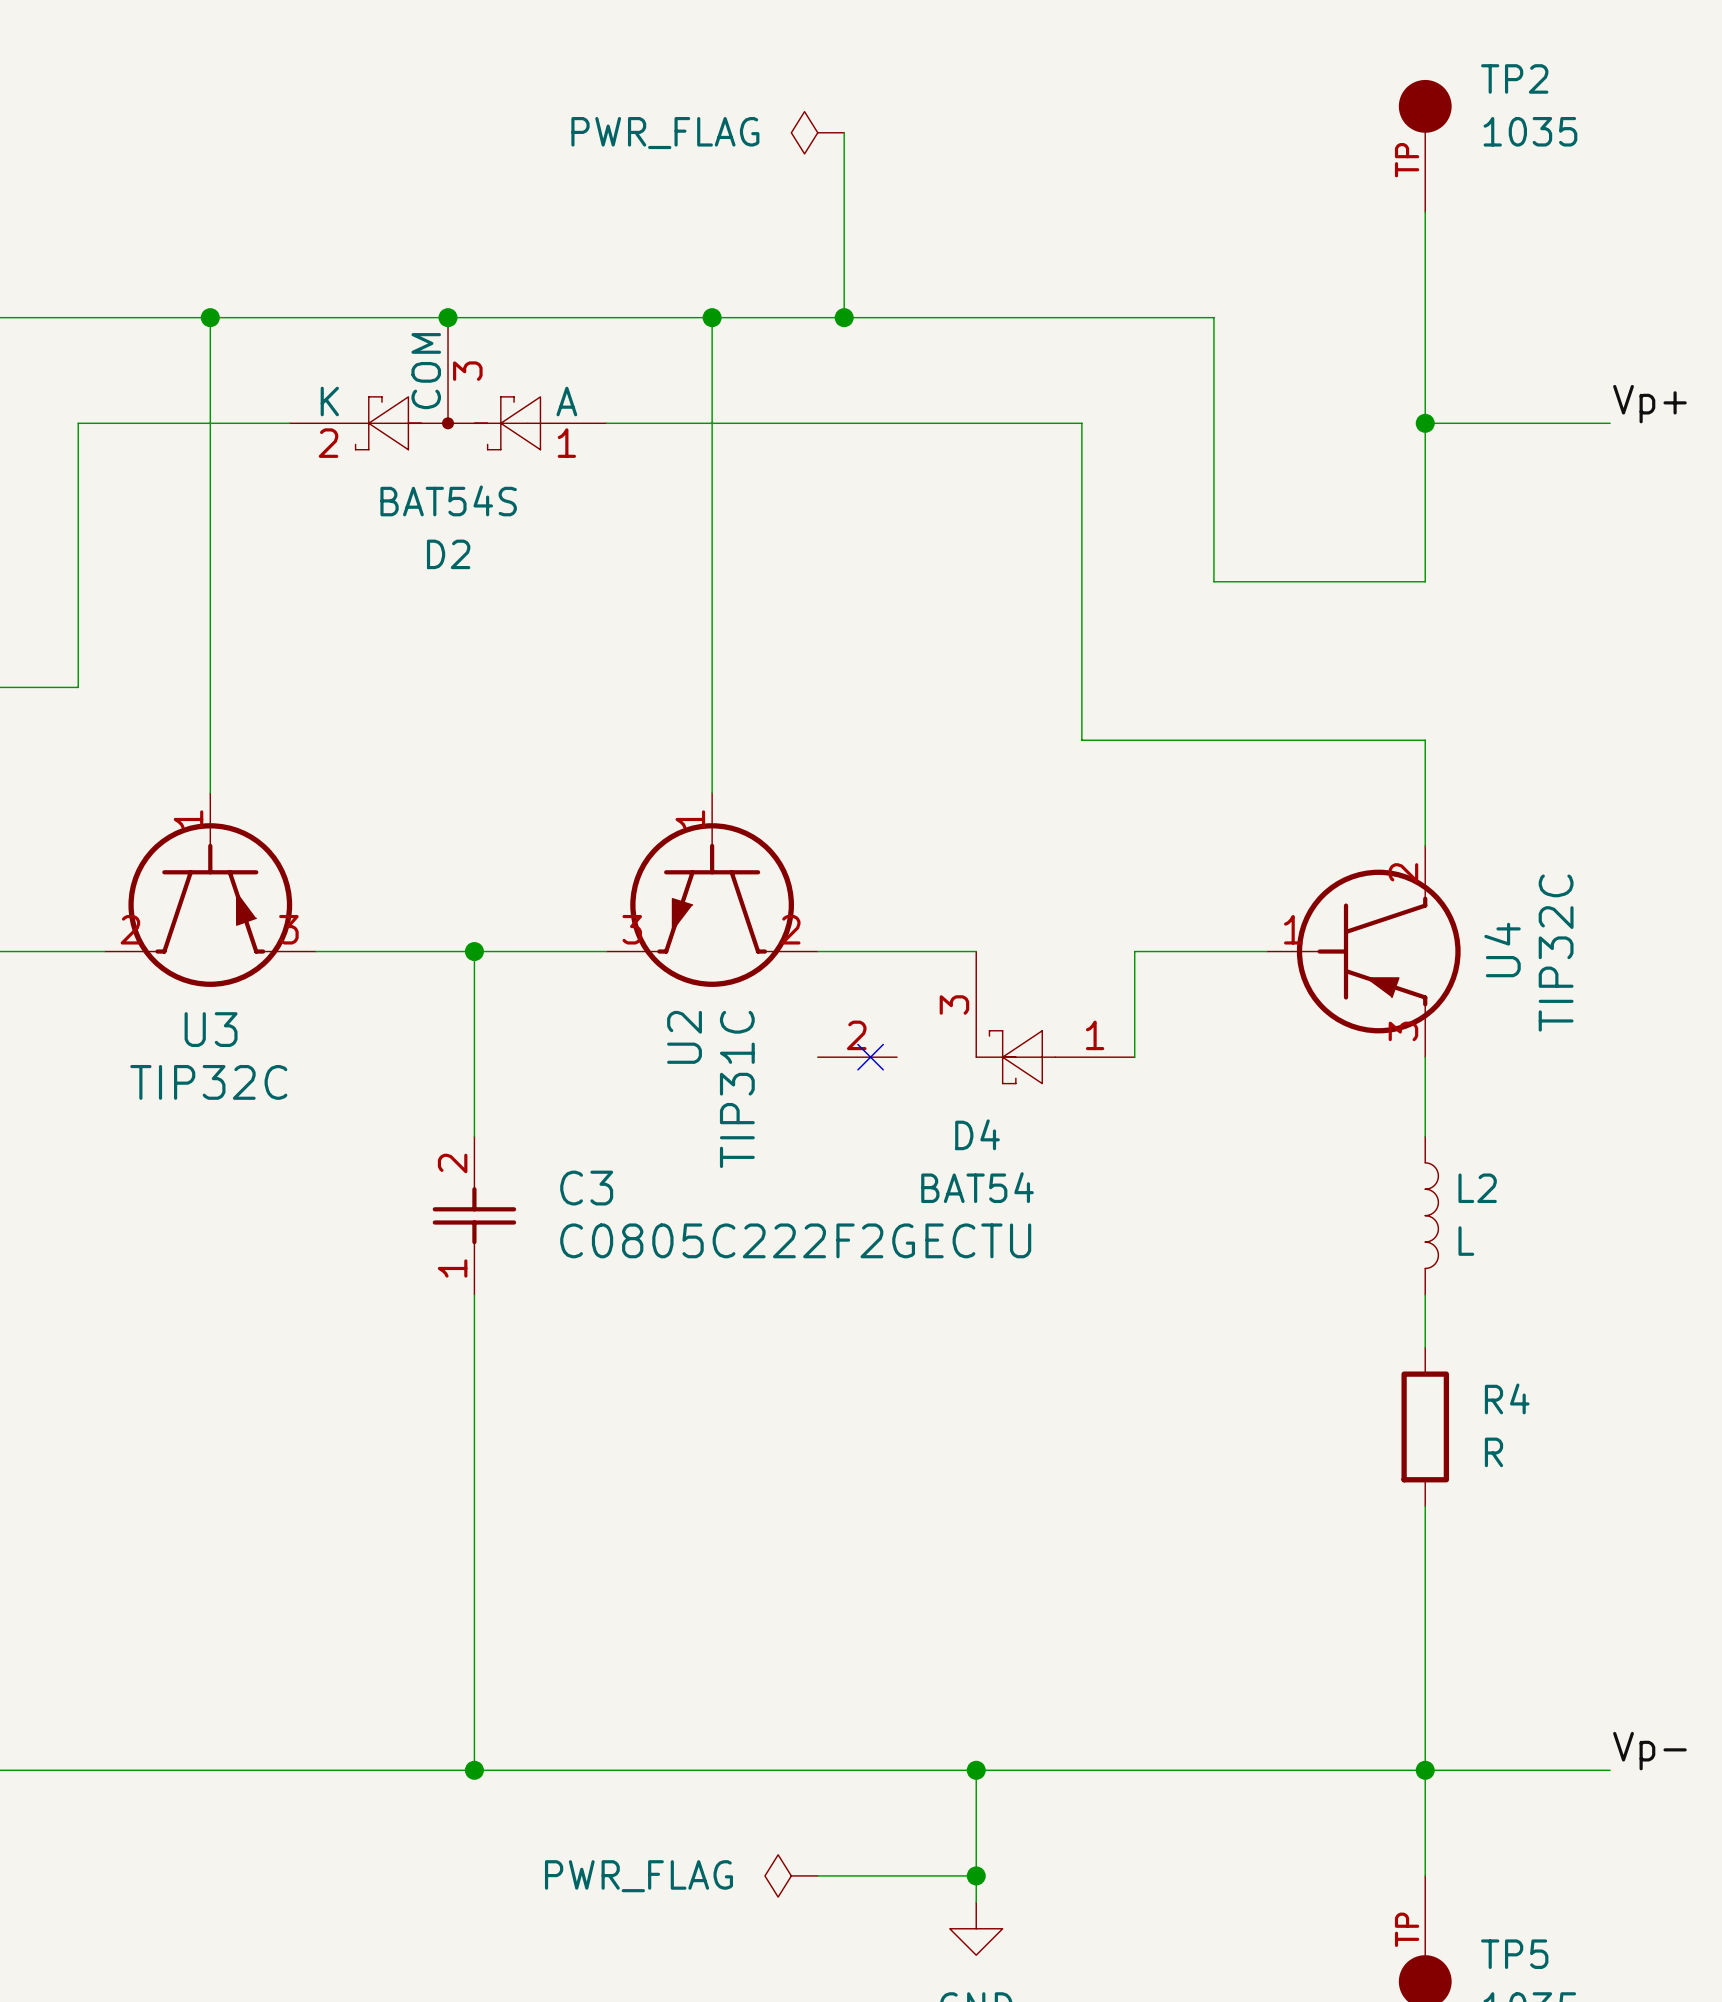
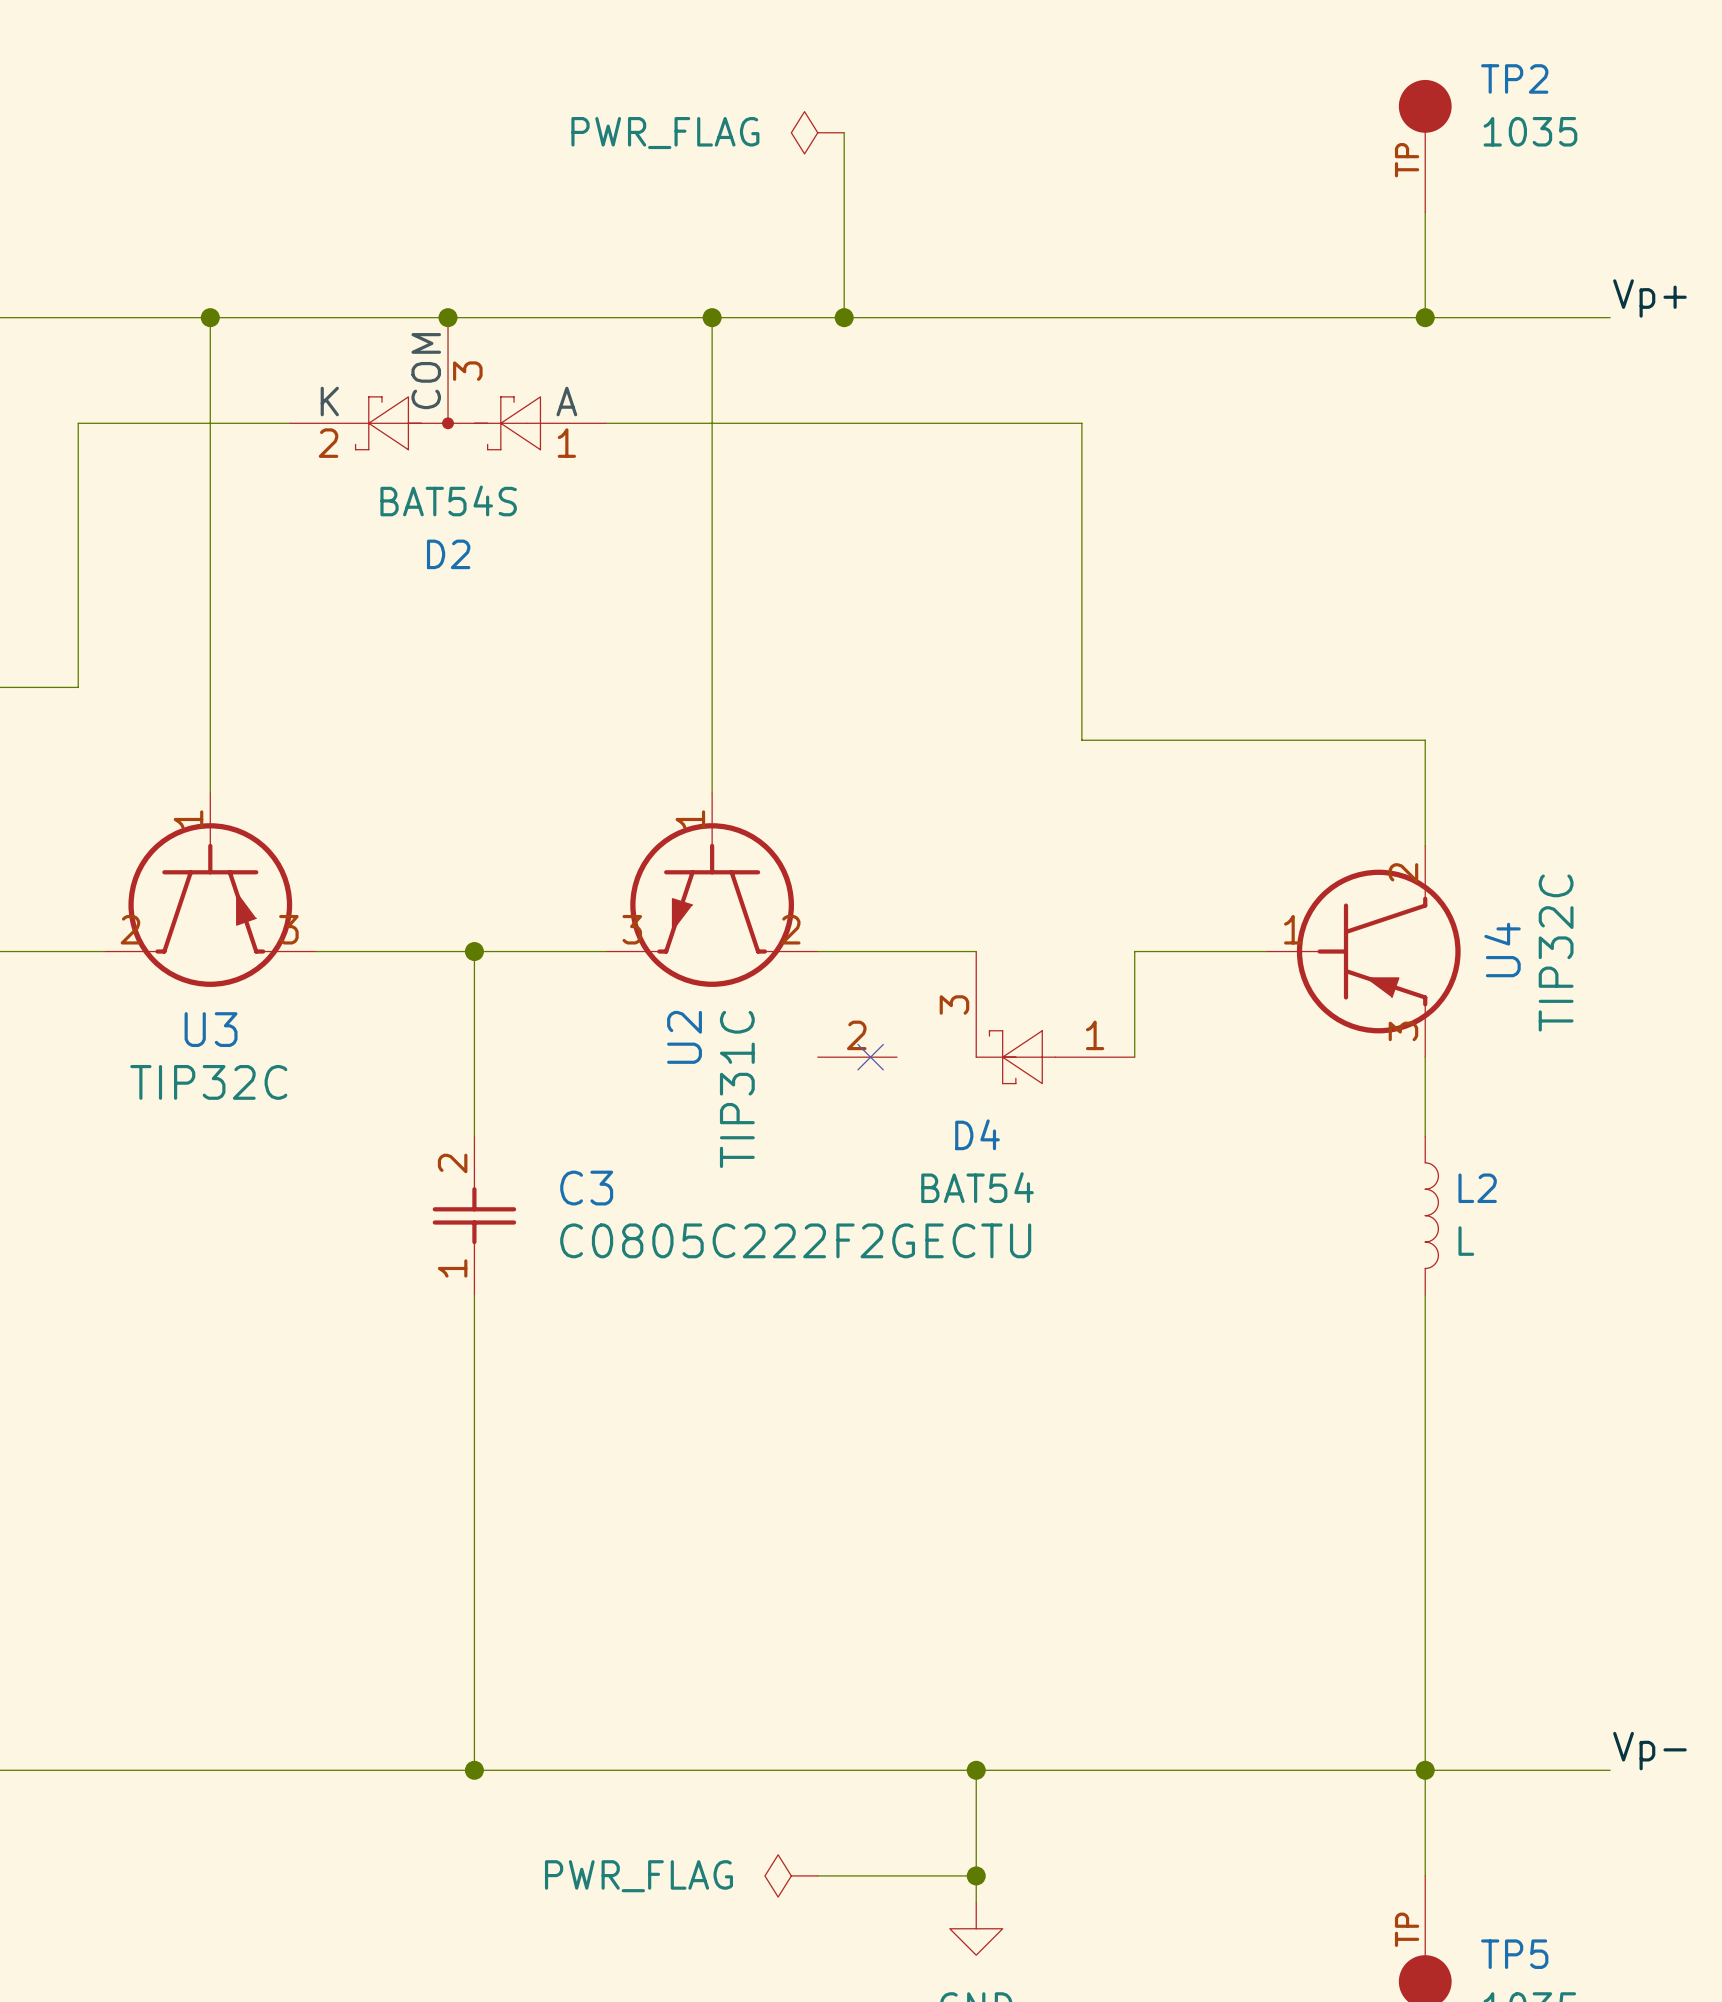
wire: (1213, 317) (1213, 581) (1425, 581) (1425, 317) -> (1213, 317) (1610, 317)
label position: Vp+ (1649, 404) -> Vp+ (1649, 298)
wire: (1425, 423) (1610, 423) -> none
junction position: (1425, 423) -> (1425, 317)
wire: none -> (1425, 1347) (1425, 1506)
R4: R (1425, 1426) -> none

